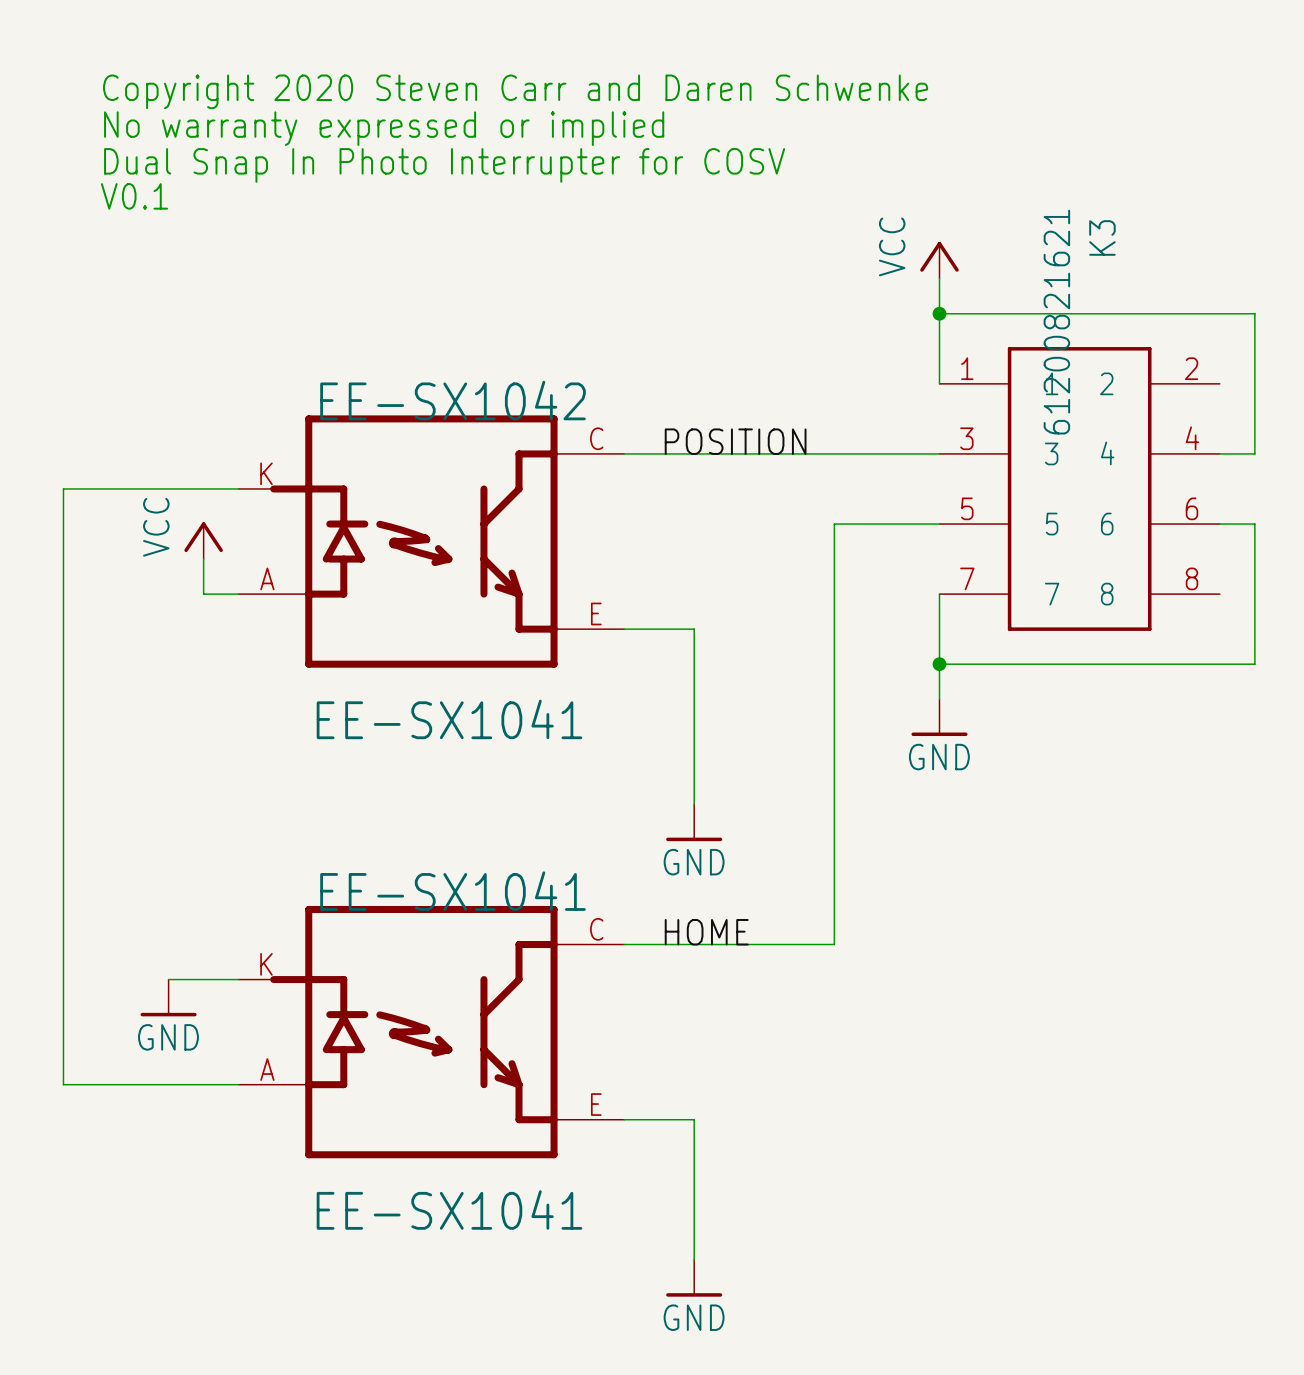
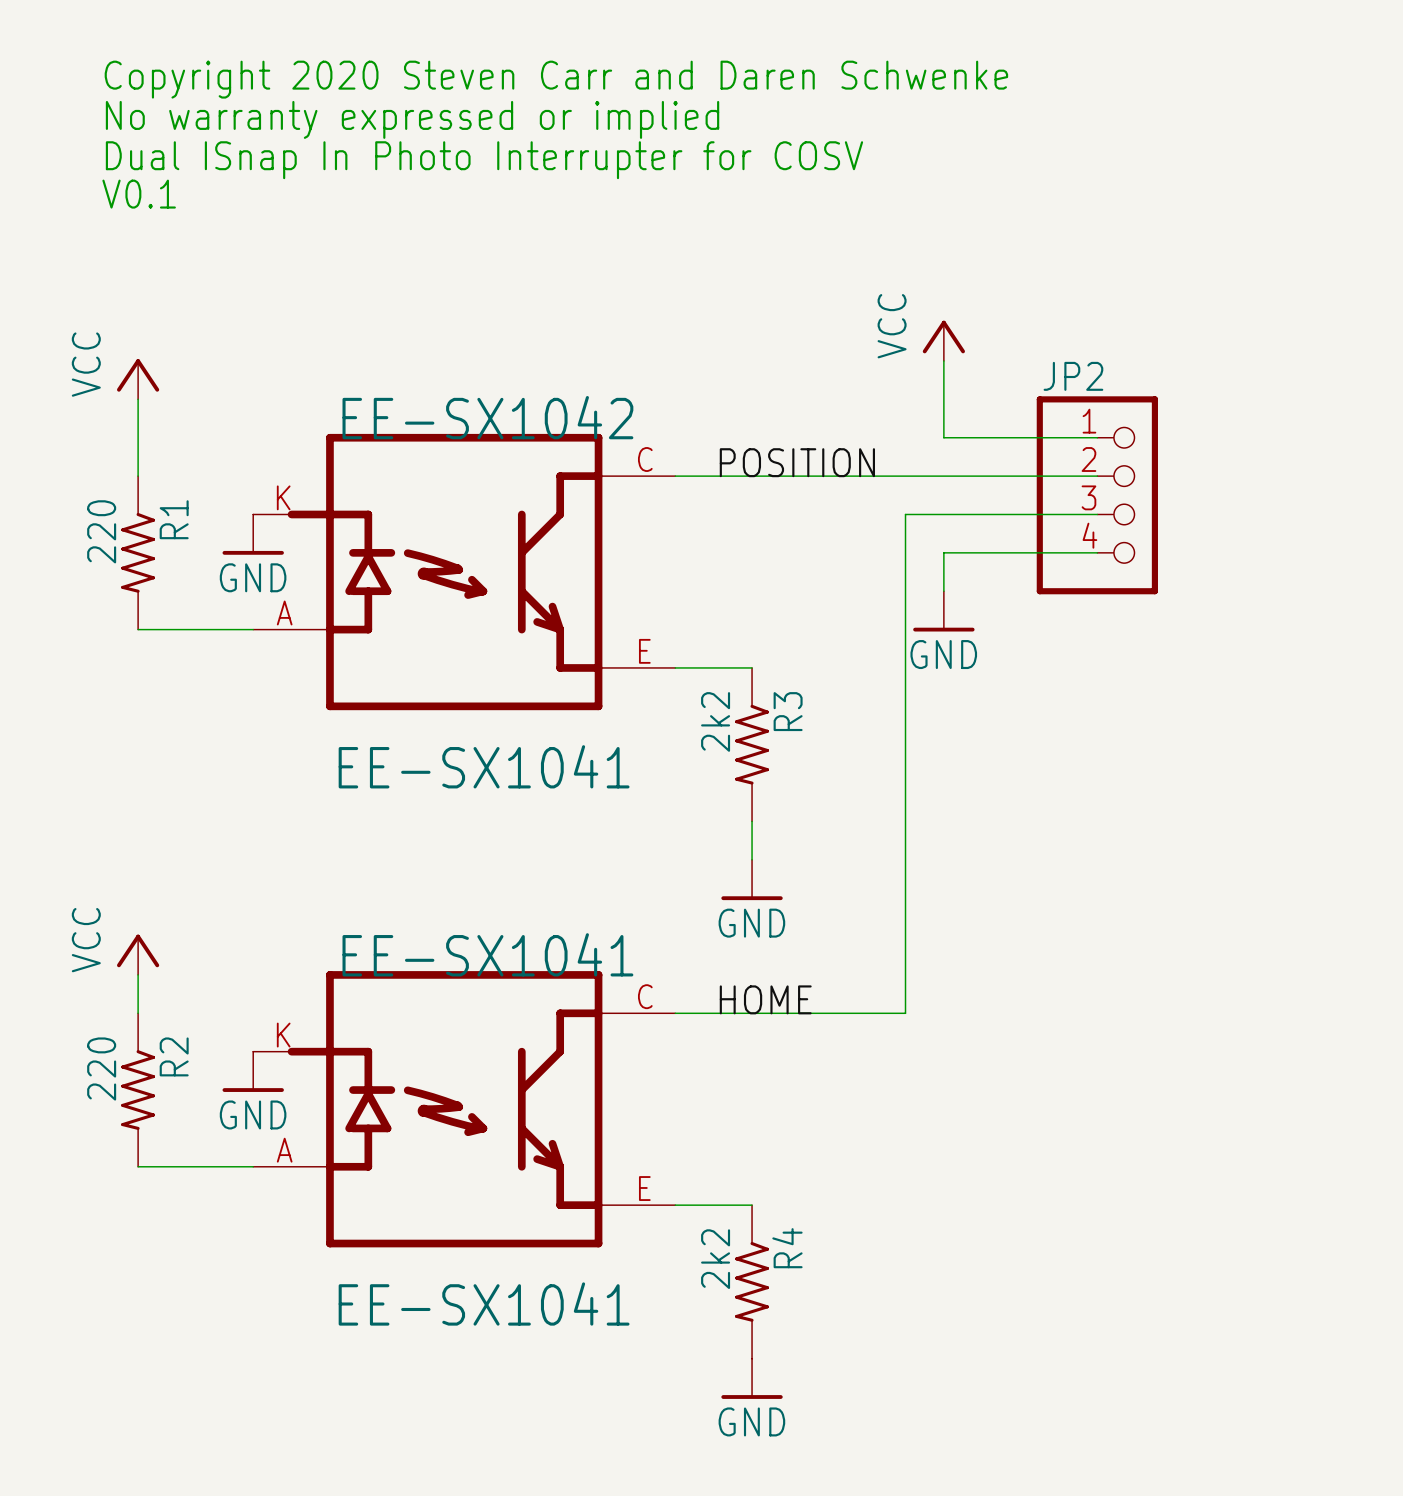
text: Dual Snap In Photo Interrupter for COSV (444, 165) -> Dual ISnap In Photo Interrupter for COSV (484, 160)
power symbol position: VCC (939, 260) -> VCC (943, 340)
wire: (939, 278) (939, 383) -> none
wire: (939, 313) (1254, 313) (1254, 453) (1219, 453) -> none
junction: (939, 313) -> none
wire: none -> (943, 361) (943, 437) (1097, 437)
power symbol: none -> VCC (138, 379)
wire: none -> (138, 399) (138, 476)
JP2: none -> (1097, 495)
wire: (238, 488) (63, 488) (63, 1084) (133, 1084) -> none
wire: none -> (1097, 514) (905, 514) (905, 552)
K3: 61200821621 (1079, 488) -> none
power symbol: none -> GND (253, 534)
R1: none -> 220 (138, 552)
wire: (834, 524) (869, 524) -> (943, 591) (943, 552)
wire: (1219, 524) (1254, 524) (1254, 664) (939, 664) -> none
power symbol: VCC (203, 540) -> none
wire: (203, 559) (203, 594) -> (138, 629) (214, 629)
wire: (939, 594) (939, 699) -> none
junction: (939, 664) -> none
R3: none -> 2k2 (752, 744)
power symbol position: GND (939, 717) -> GND (943, 611)
power symbol: none -> VCC (138, 954)
wire: none -> (138, 974) (138, 1013)
wire: (168, 979) (238, 979) -> none
power symbol position: GND (168, 997) -> GND (253, 1071)
R2: none -> 220 (138, 1090)
R4: none -> 2k2 (752, 1281)

